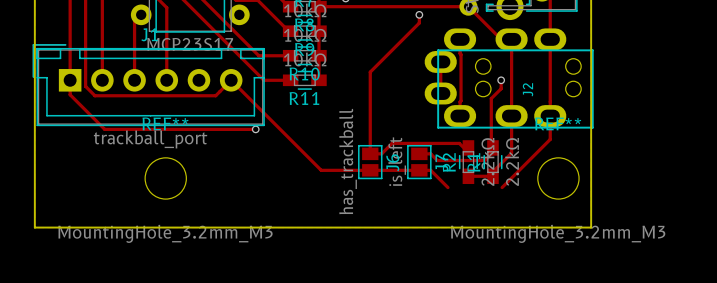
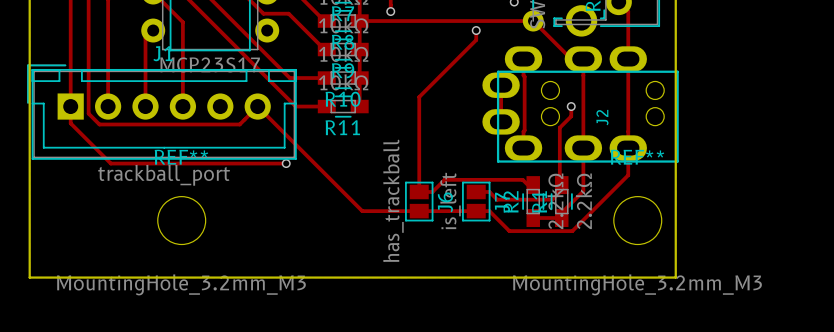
track: none -> (509, 231) (572, 231)

